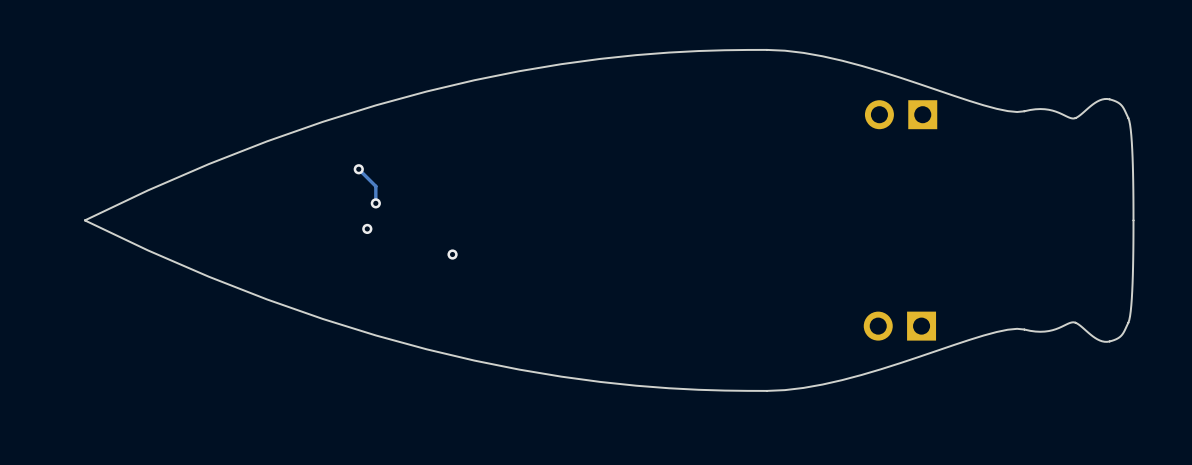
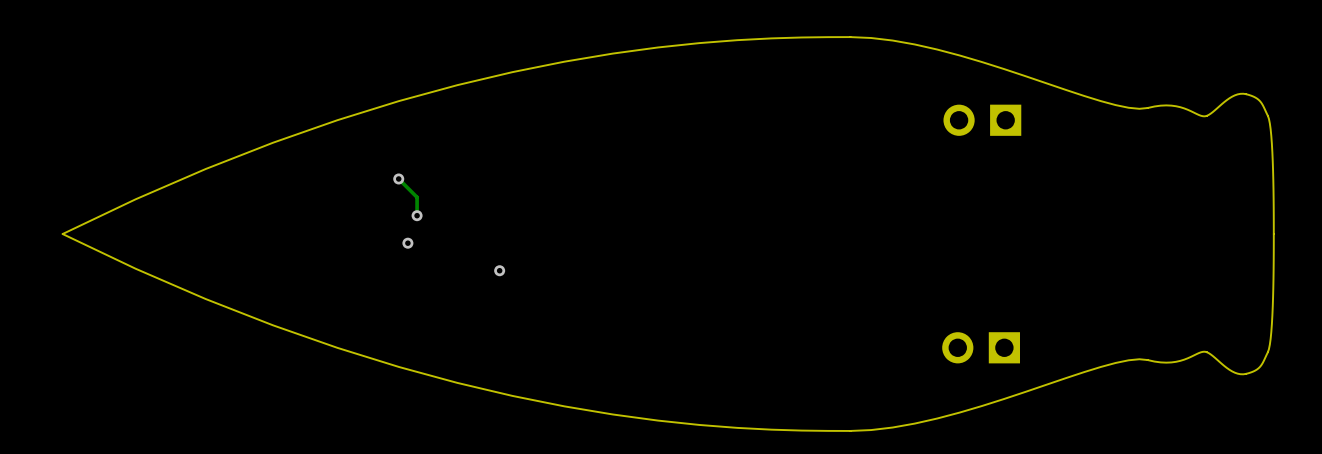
board edge: (766, 49) (803, 52) (842, 60) (1007, 111) (1044, 109) (1073, 118) (1102, 99) (1109, 99) (1120, 104) (1130, 124) (1133, 197) (1131, 305) (1129, 320) (1122, 334) (1112, 340) (1102, 341) (1073, 322) (1044, 331) (1007, 329) (969, 339) (861, 374) (822, 384) (784, 390) (698, 389) (600, 381) (474, 360) (376, 335) (322, 318) (208, 276) (84, 220) (148, 190) (267, 141) (322, 121) (426, 91) (519, 71) (600, 58) (668, 52) (766, 49) -> (850, 37) (892, 40) (937, 49) (982, 62) (1100, 101) (1128, 107) (1139, 108) (1171, 105) (1204, 116) (1237, 94) (1246, 94) (1258, 99) (1264, 108) (1269, 123) (1273, 207) (1271, 332) (1268, 349) (1260, 365) (1249, 373) (1237, 373) (1204, 351) (1171, 362) (1139, 359) (1128, 360) (1084, 372) (959, 412) (914, 423) (871, 430) (771, 429) (657, 420) (564, 406) (512, 395) (398, 366) (337, 347) (205, 299) (62, 234) (135, 199) (273, 142) (337, 120) (457, 85) (564, 61) (657, 47) (737, 40) (850, 37)

